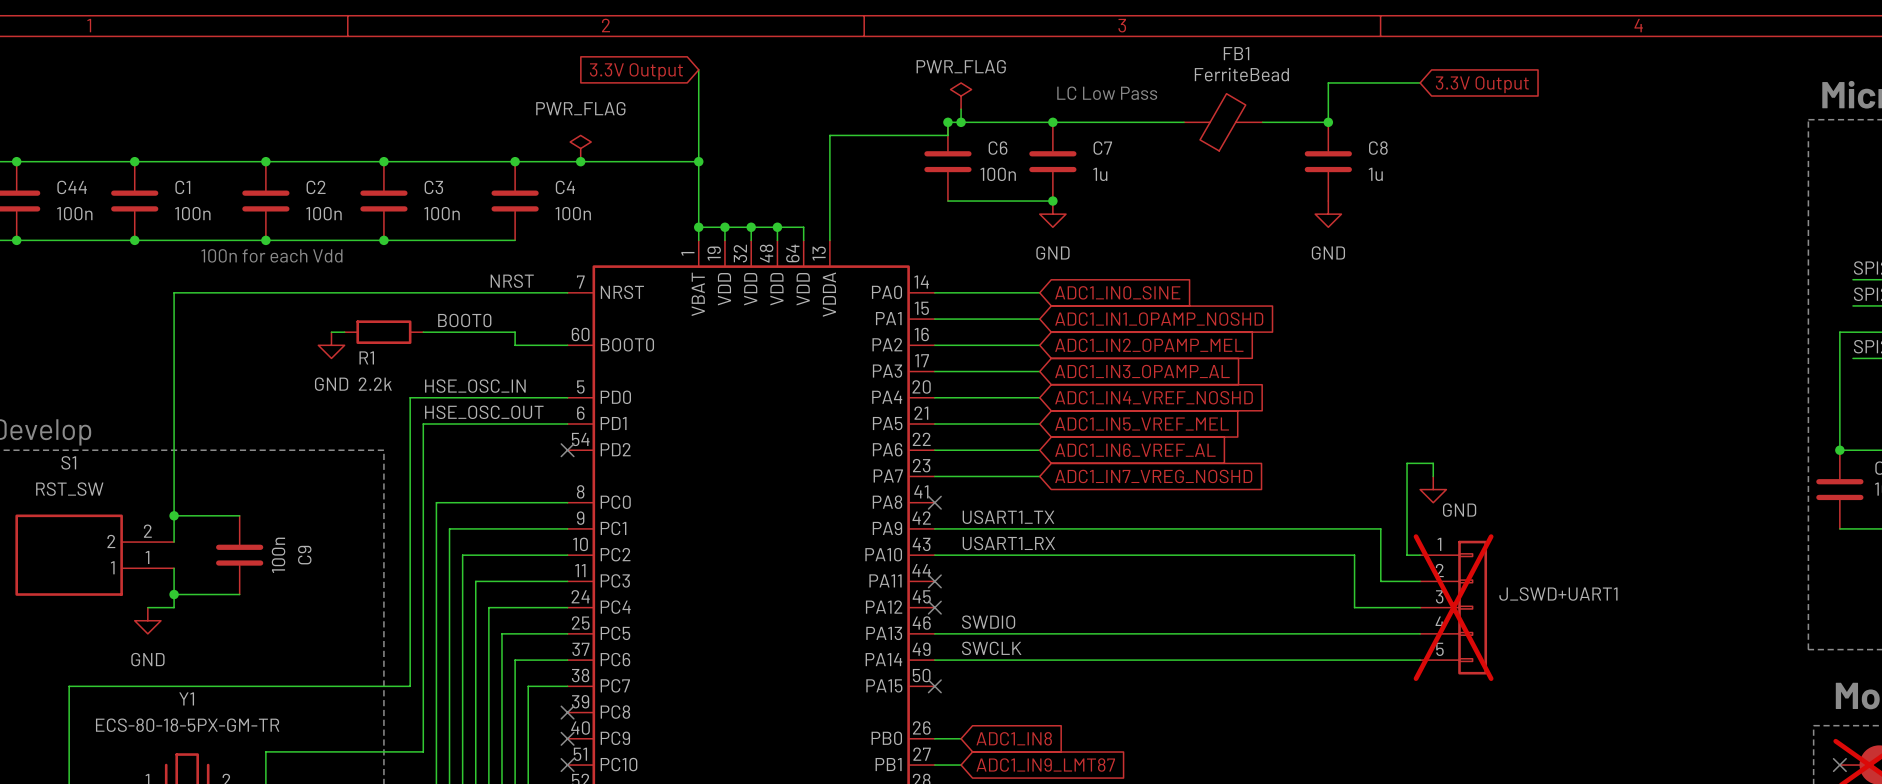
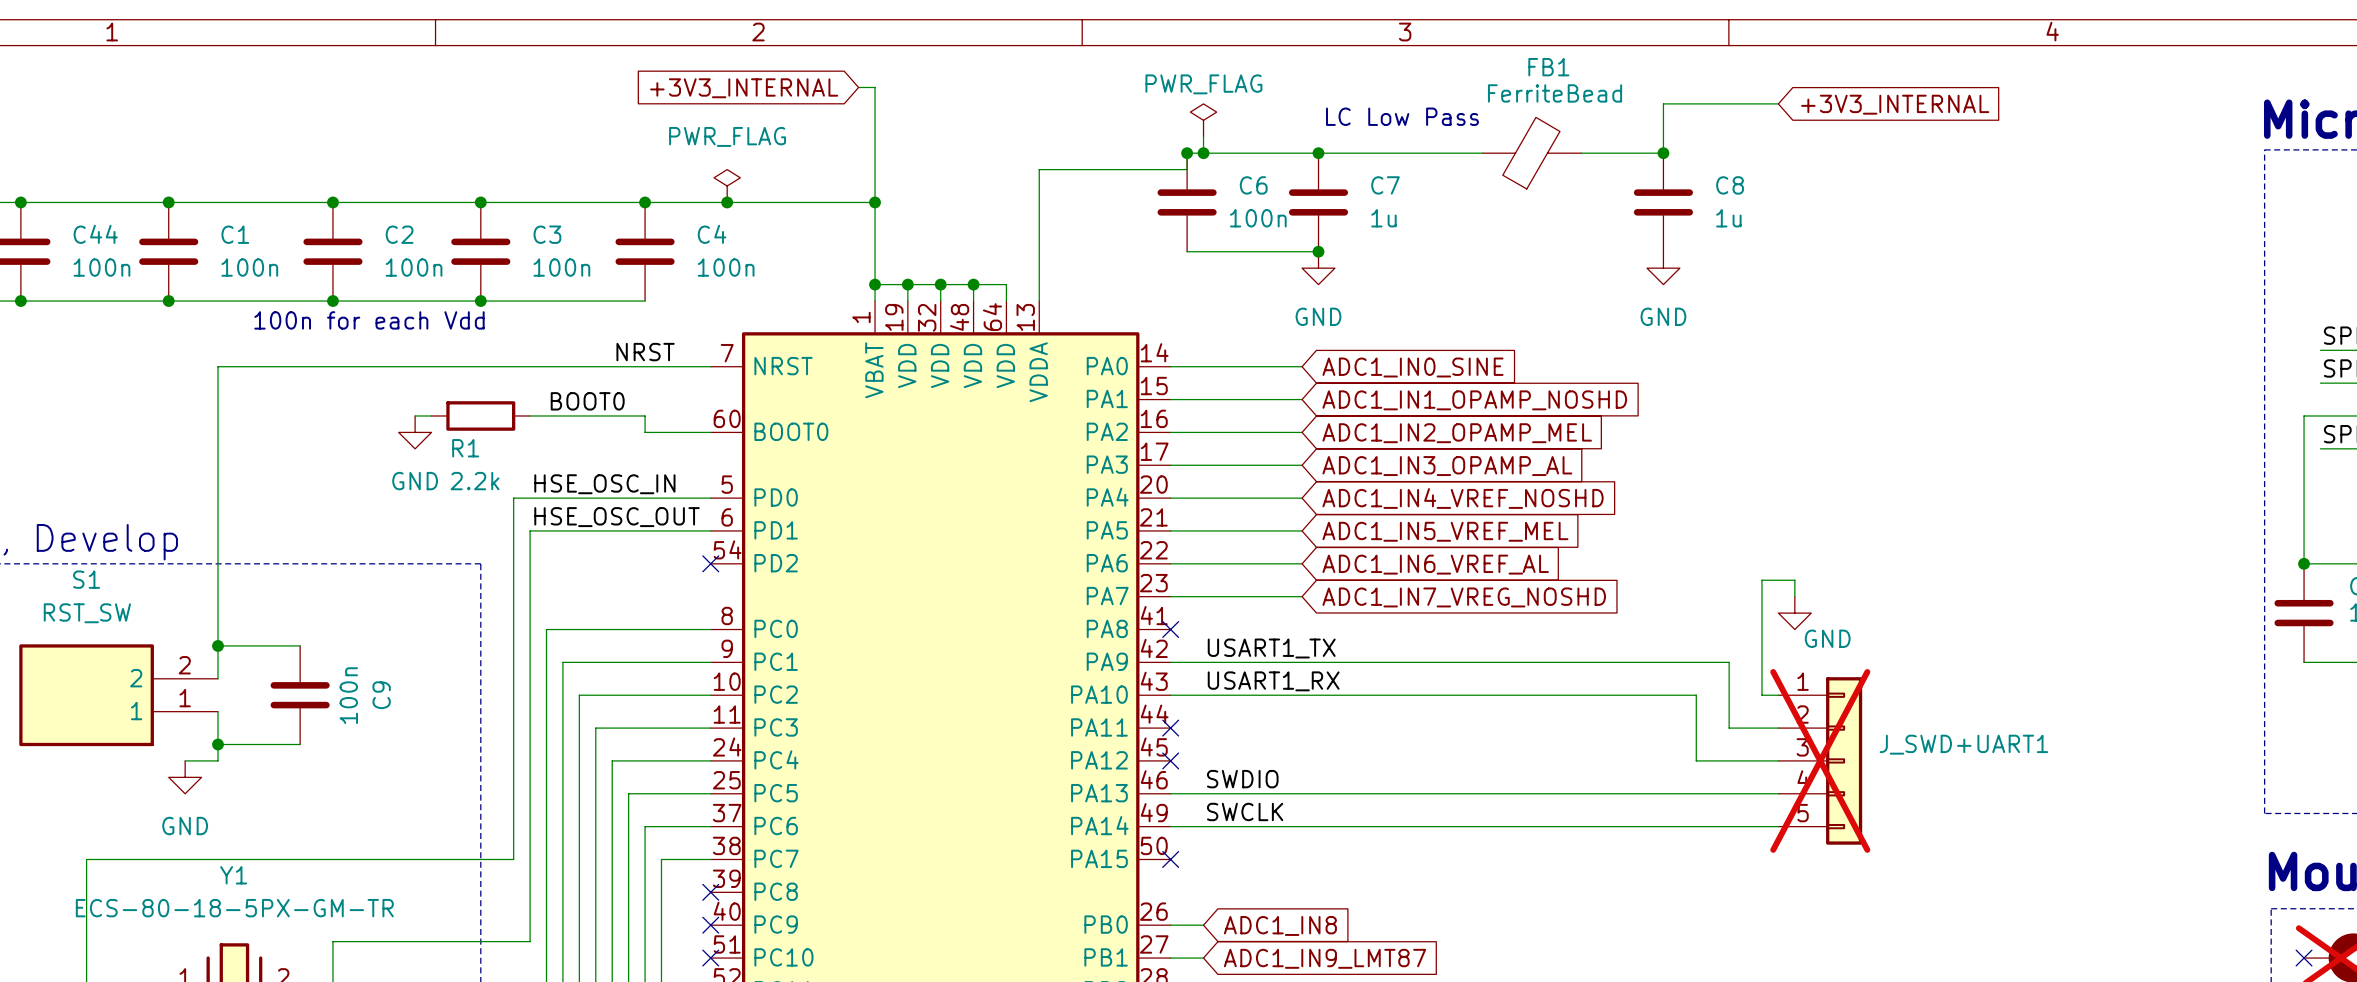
global label: none -> +3V3_INTERNAL (744, 88)
wire: none -> (858, 87) (875, 87)
global label: 3.3V Output (636, 71) -> none
global label: 3.3V Output (1482, 84) -> +3V3_INTERNAL (1895, 104)

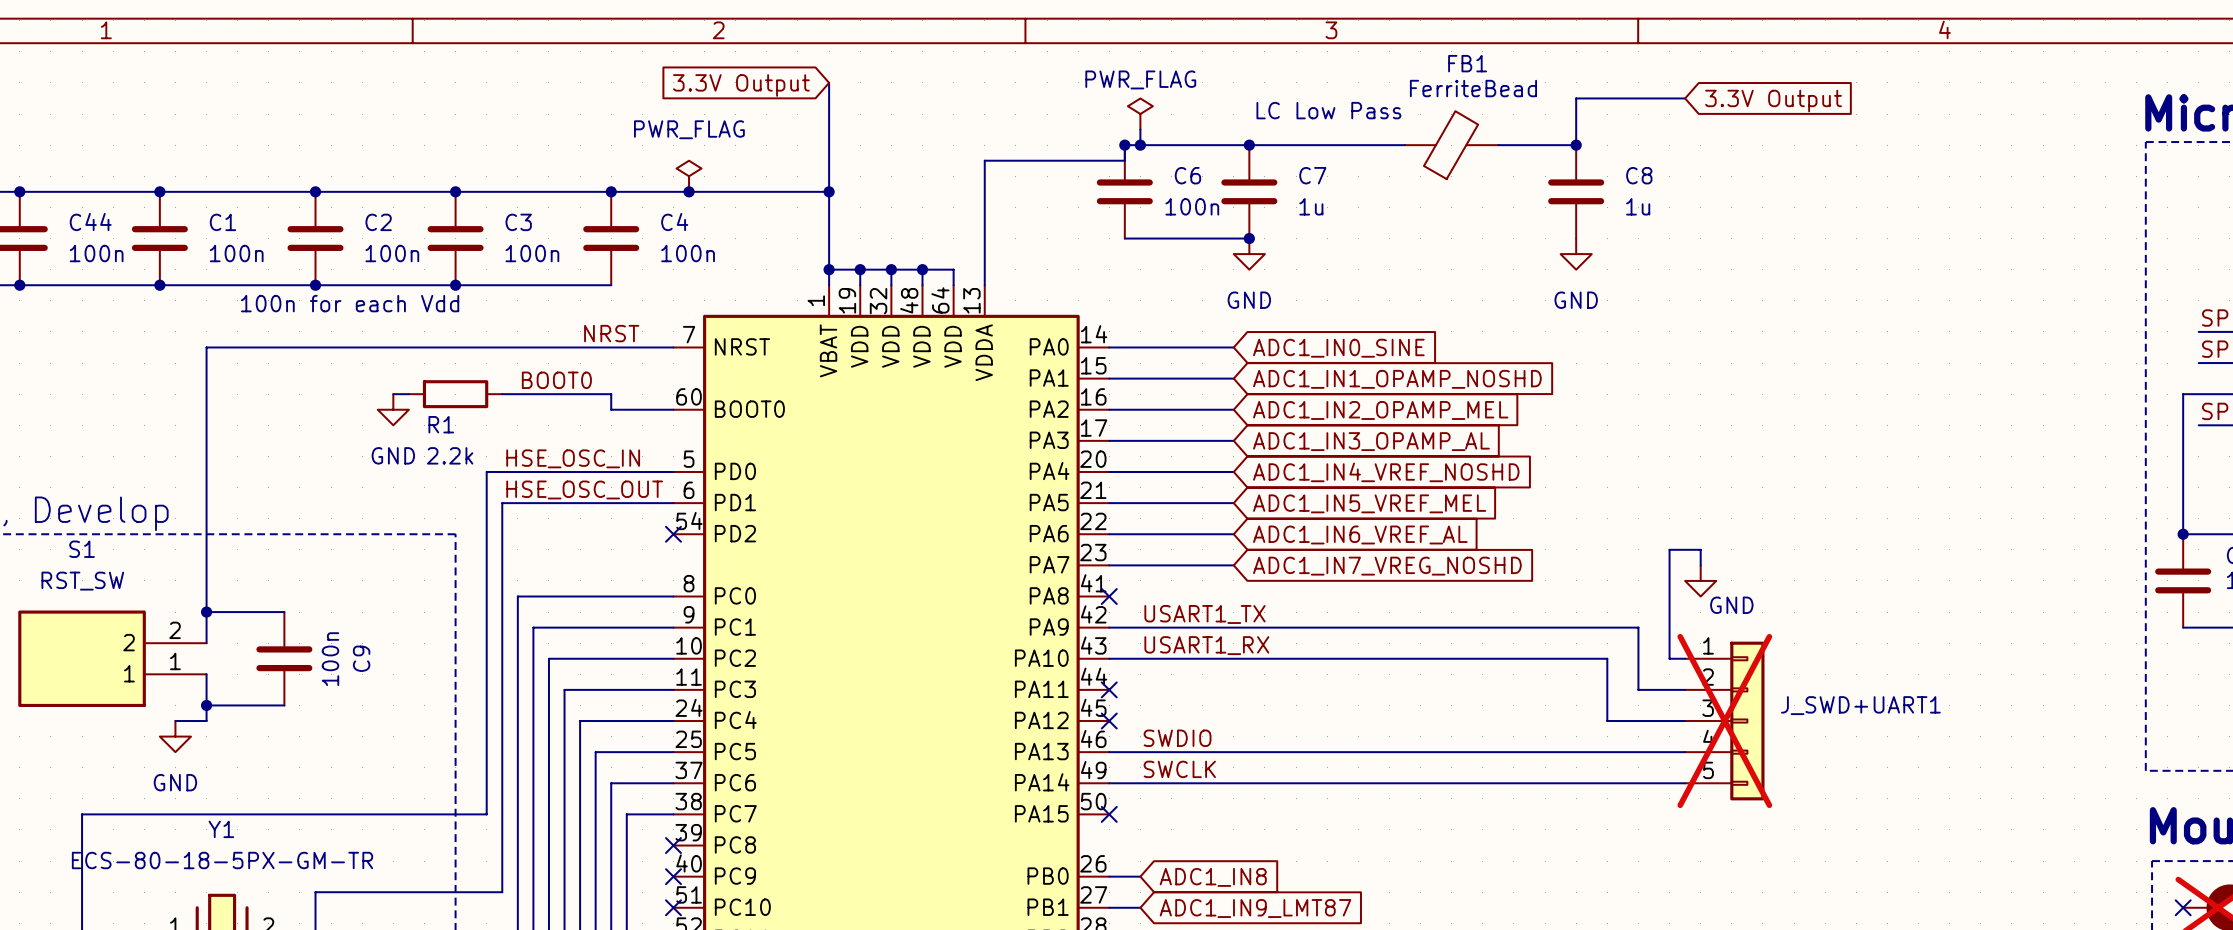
wire: (858, 87) (875, 87) -> none
global label: +3V3_INTERNAL (744, 88) -> none
global label: none -> 3.3V Output (741, 85)
global label: +3V3_INTERNAL (1895, 104) -> 3.3V Output (1773, 101)

